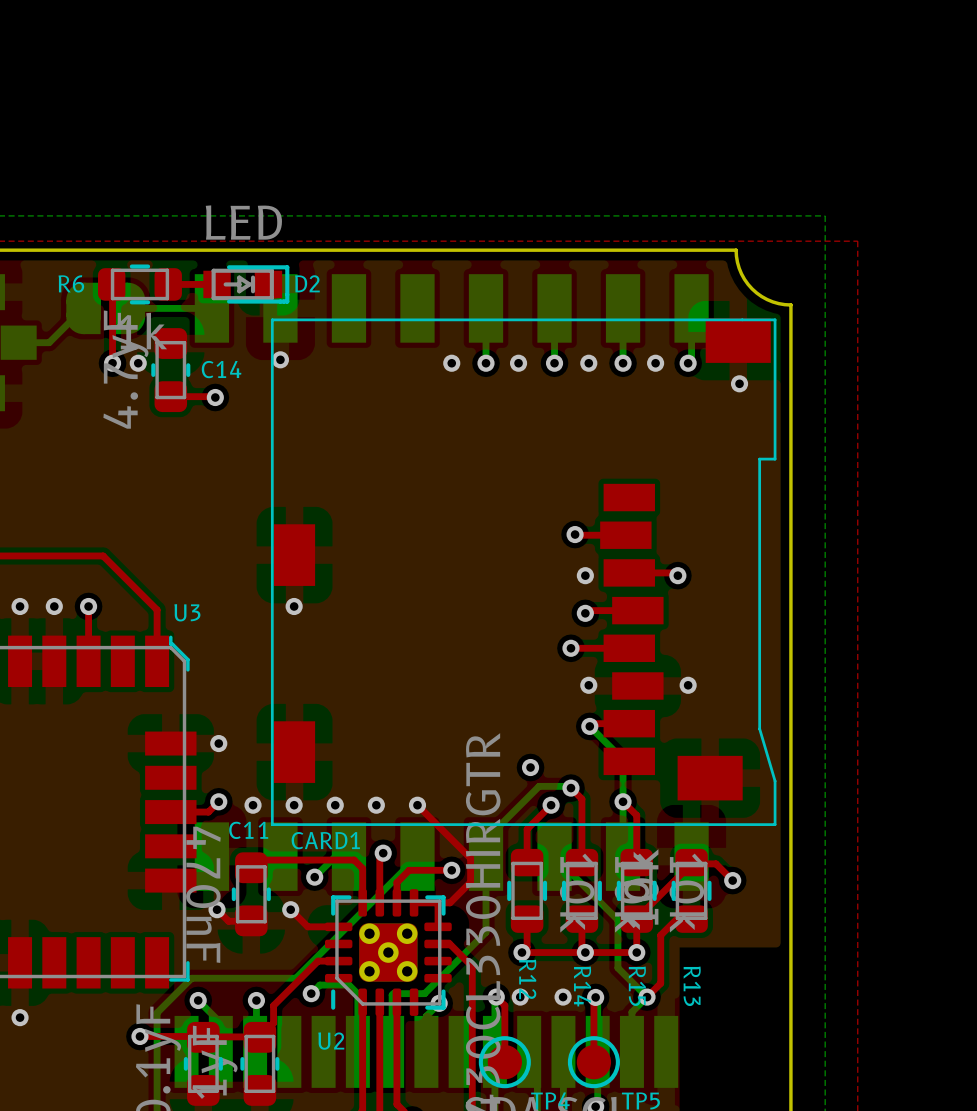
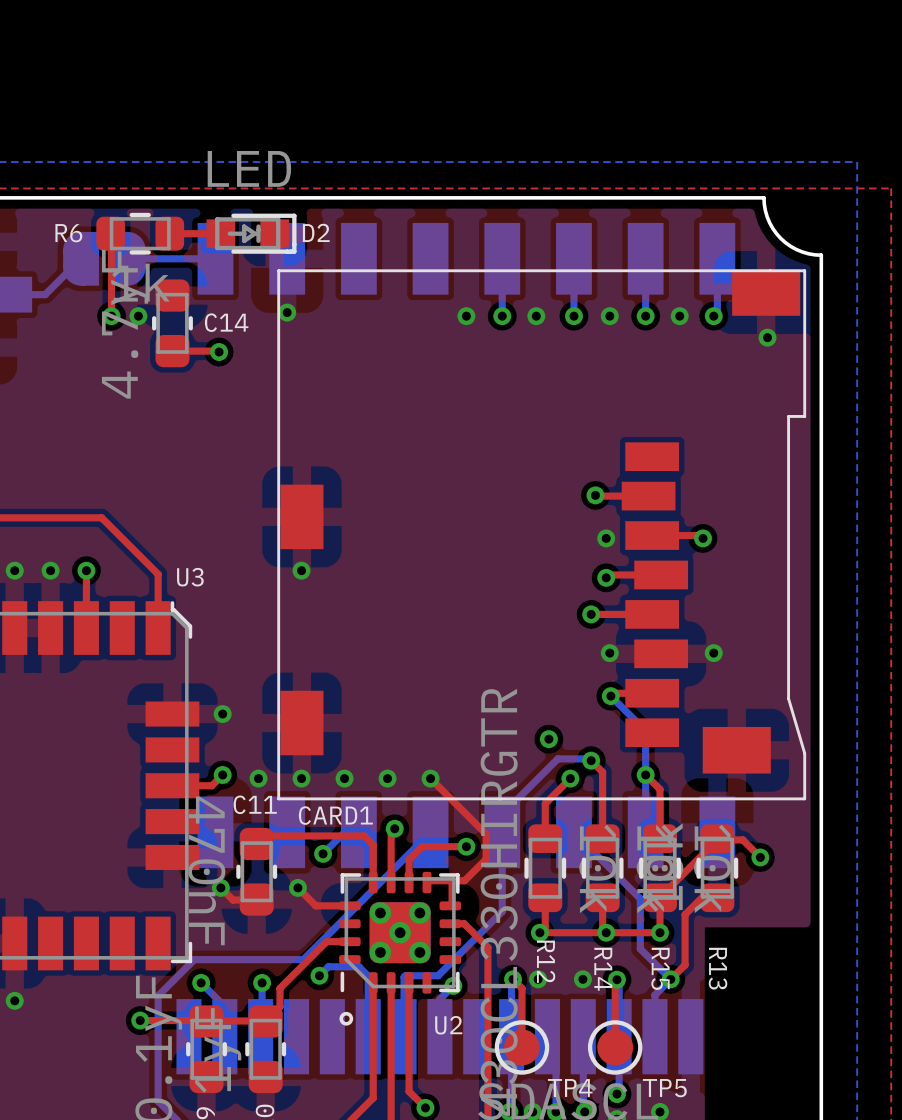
U2 footprint: [324, 889, 452, 1016] -> [339, 871, 462, 1026]
U2 name position: U2 (331, 1041) -> U2 (448, 1025)

